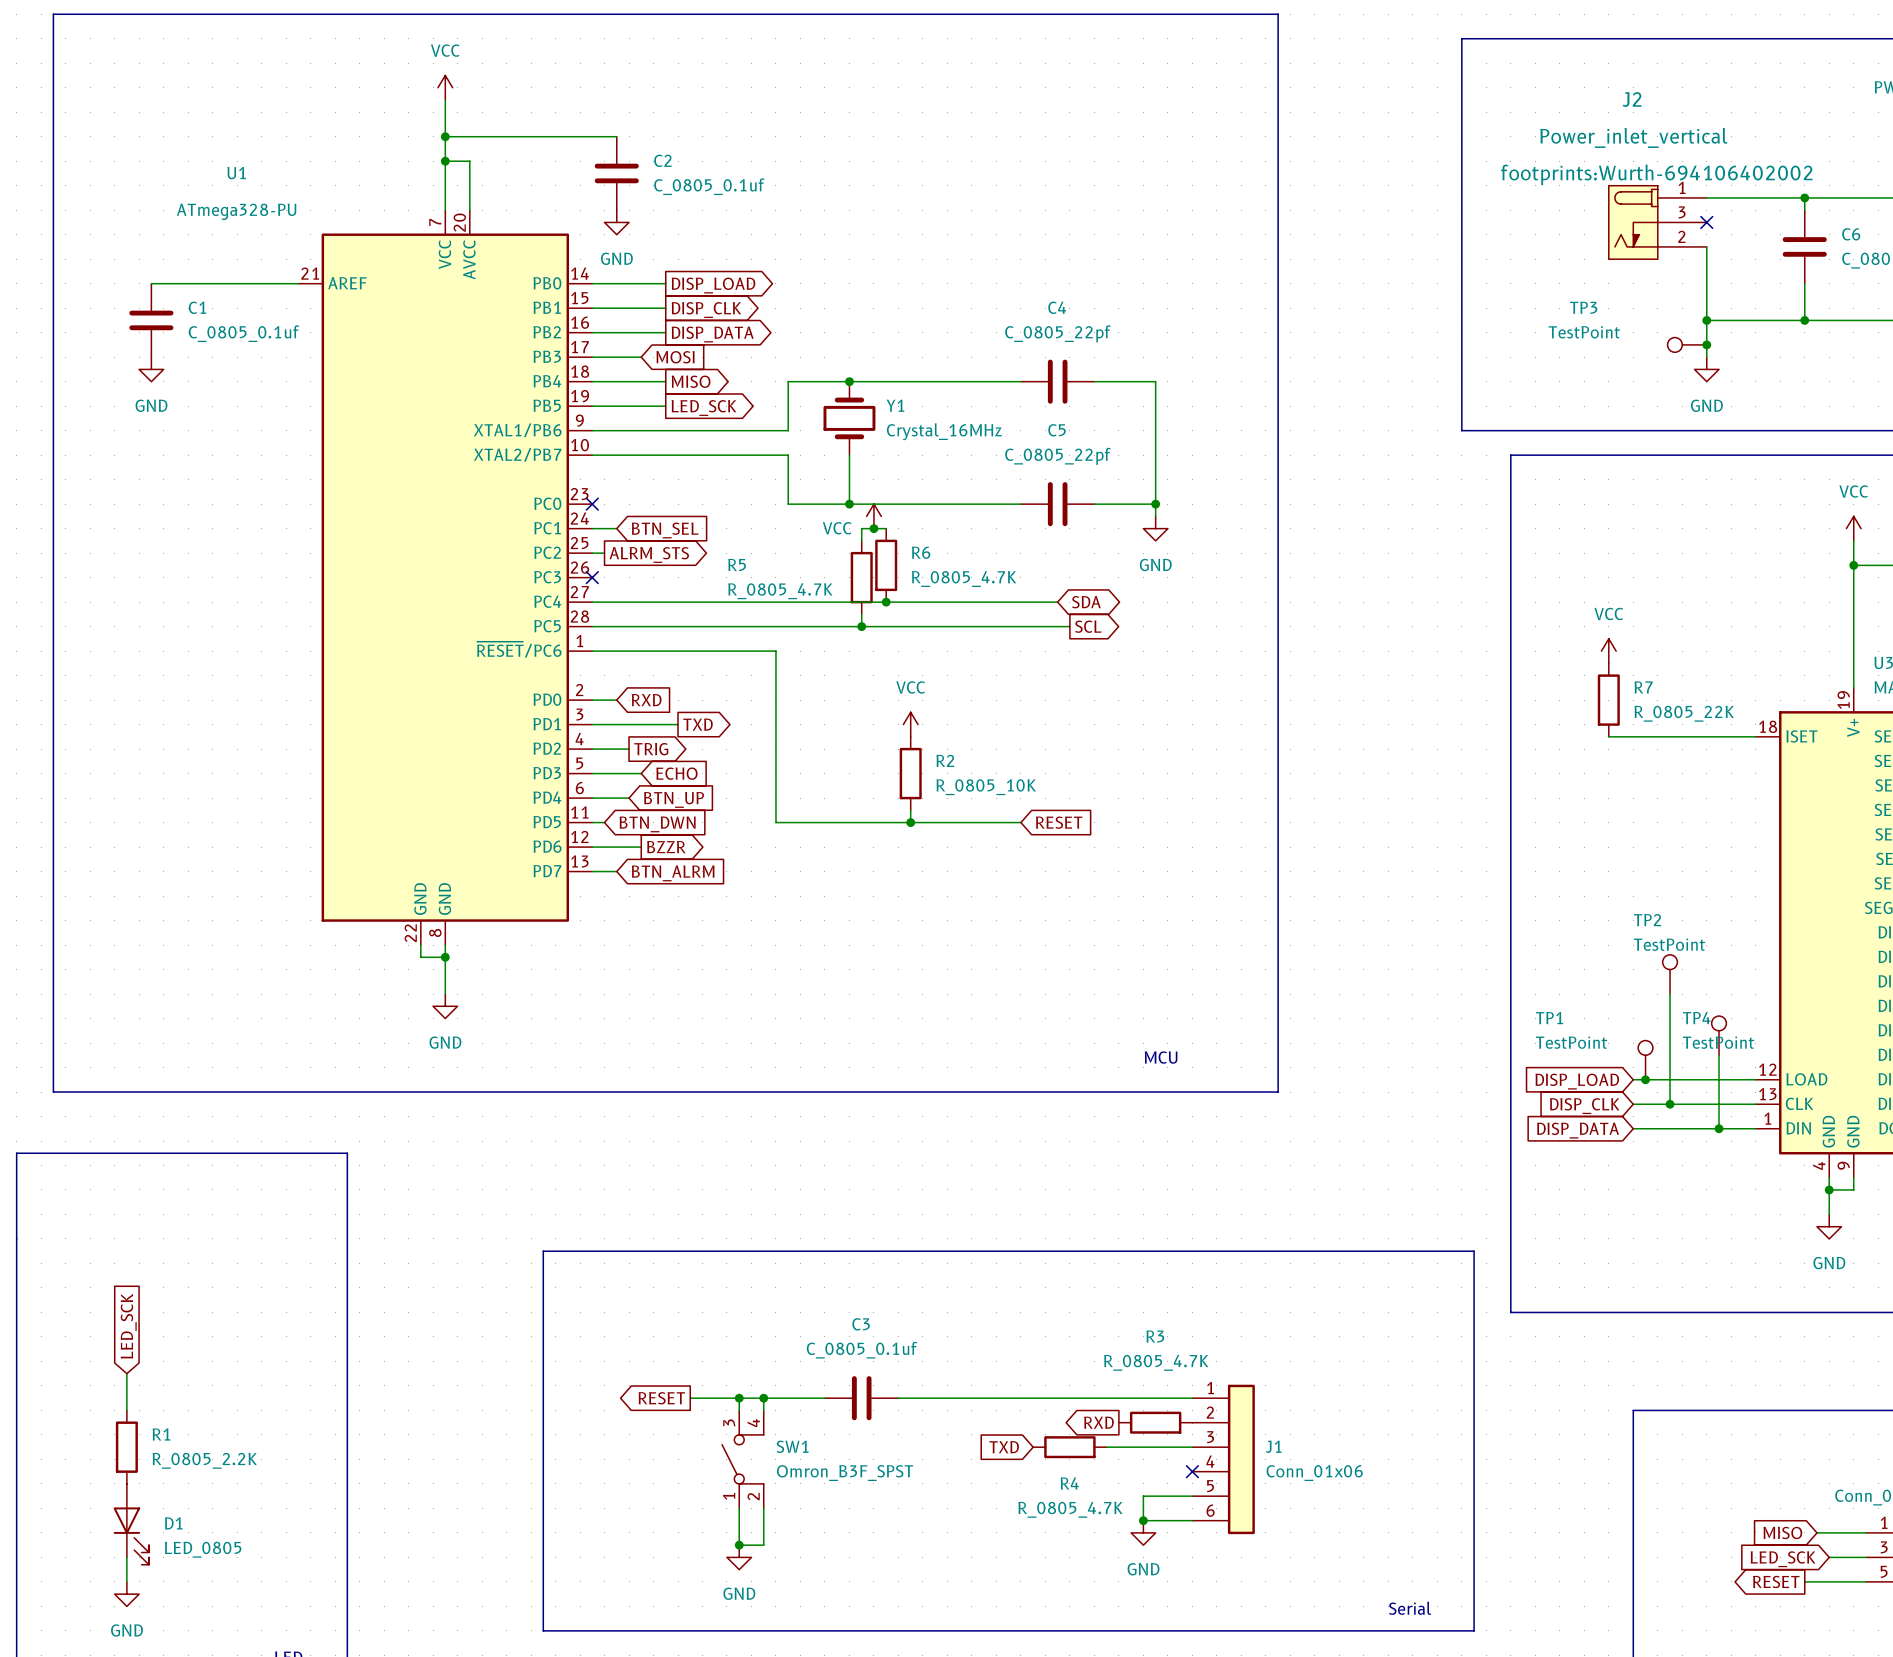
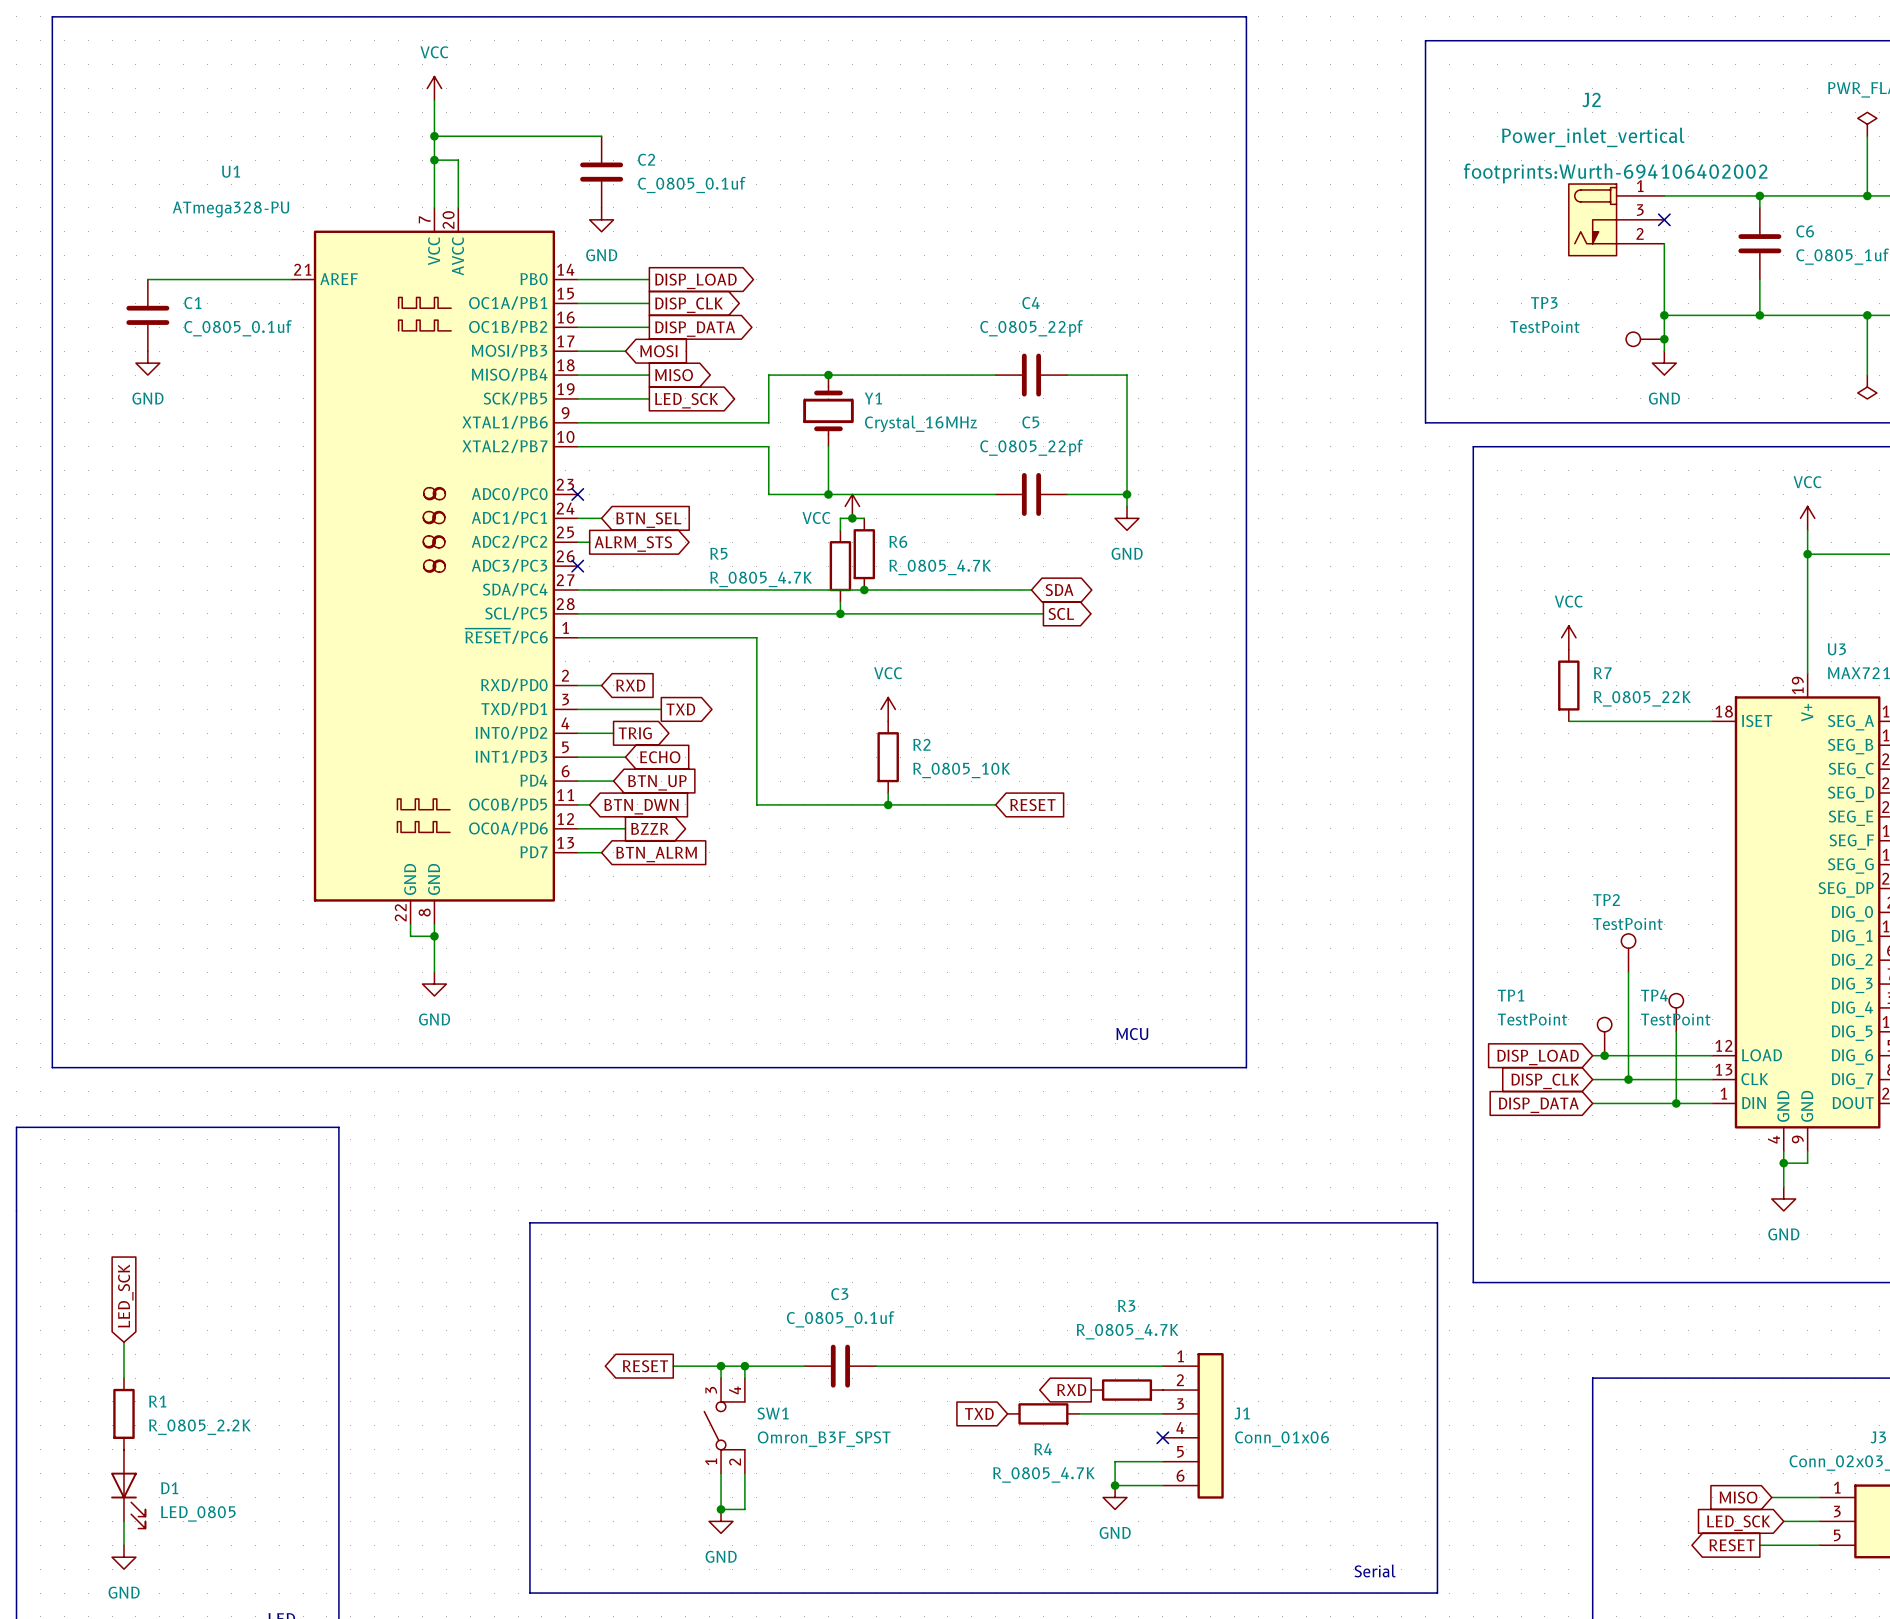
U1 symbol: [298, 210, 593, 946] -> [291, 207, 578, 925]

